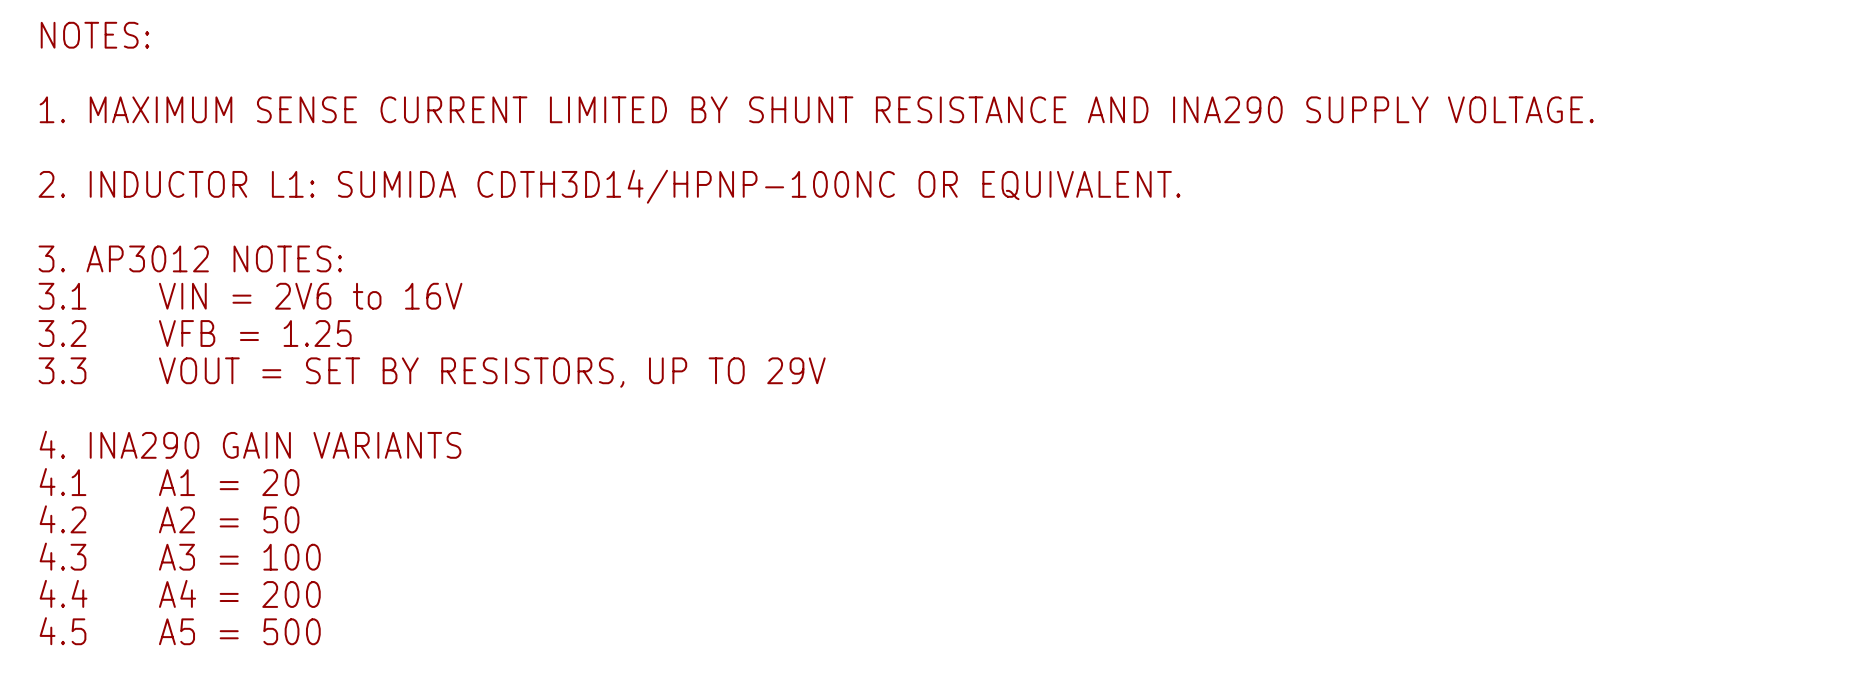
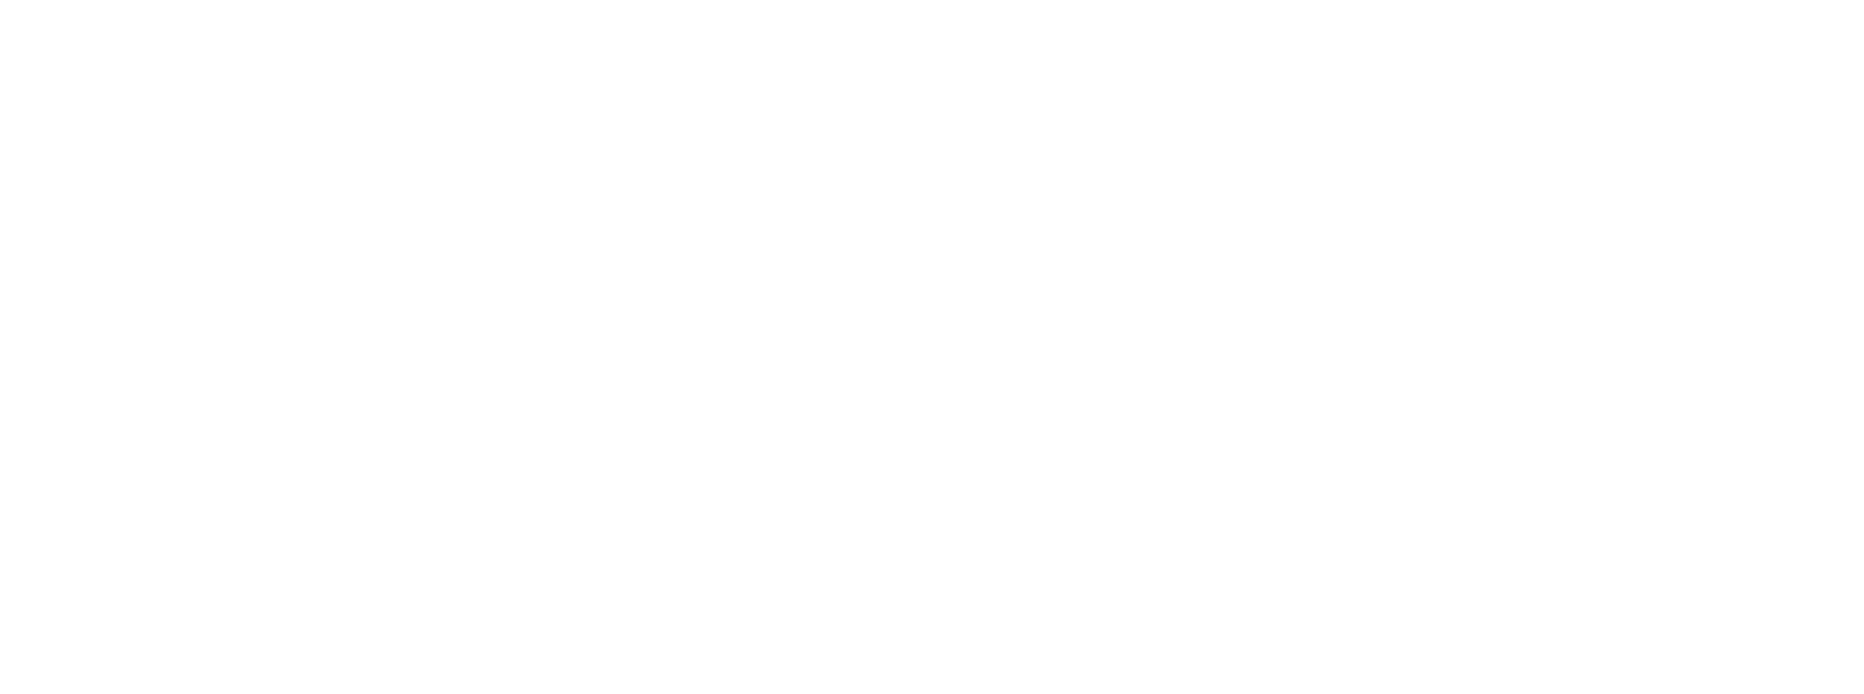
text: NOTES: (94, 35) -> none
text: 1. MAXIMUM SENSE CURRENT LIMITED BY SHUNT RESISTANCE AND INA290 SUPPLY VOLTAGE. (816, 109) -> none
text: 2. INDUCTOR L1: SUMIDA CDTH3D14/HPNP-100NC OR EQUIVALENT. (609, 186) -> none
text: 3. AP3012 NOTES: (190, 258) -> none
text: 3.1 VIN = 2V6 to 16V (250, 296) -> none
text: 3.2 VFB = 1.25 (195, 333) -> none
text: 3.3 VOUT = SET BY RESISTORS, UP TO 29V (432, 372) -> none
text: 4. INA290 GAIN VARIANTS (250, 444) -> none
text: 4.1 A1 = 20 (169, 482) -> none
text: 4.2 A2 = 50 (169, 519) -> none
text: 4.3 A3 = 100 (180, 556) -> none
text: 4.4 A4 = 200 (180, 593) -> none
text: 4.5 A5 = 500 (180, 631) -> none

